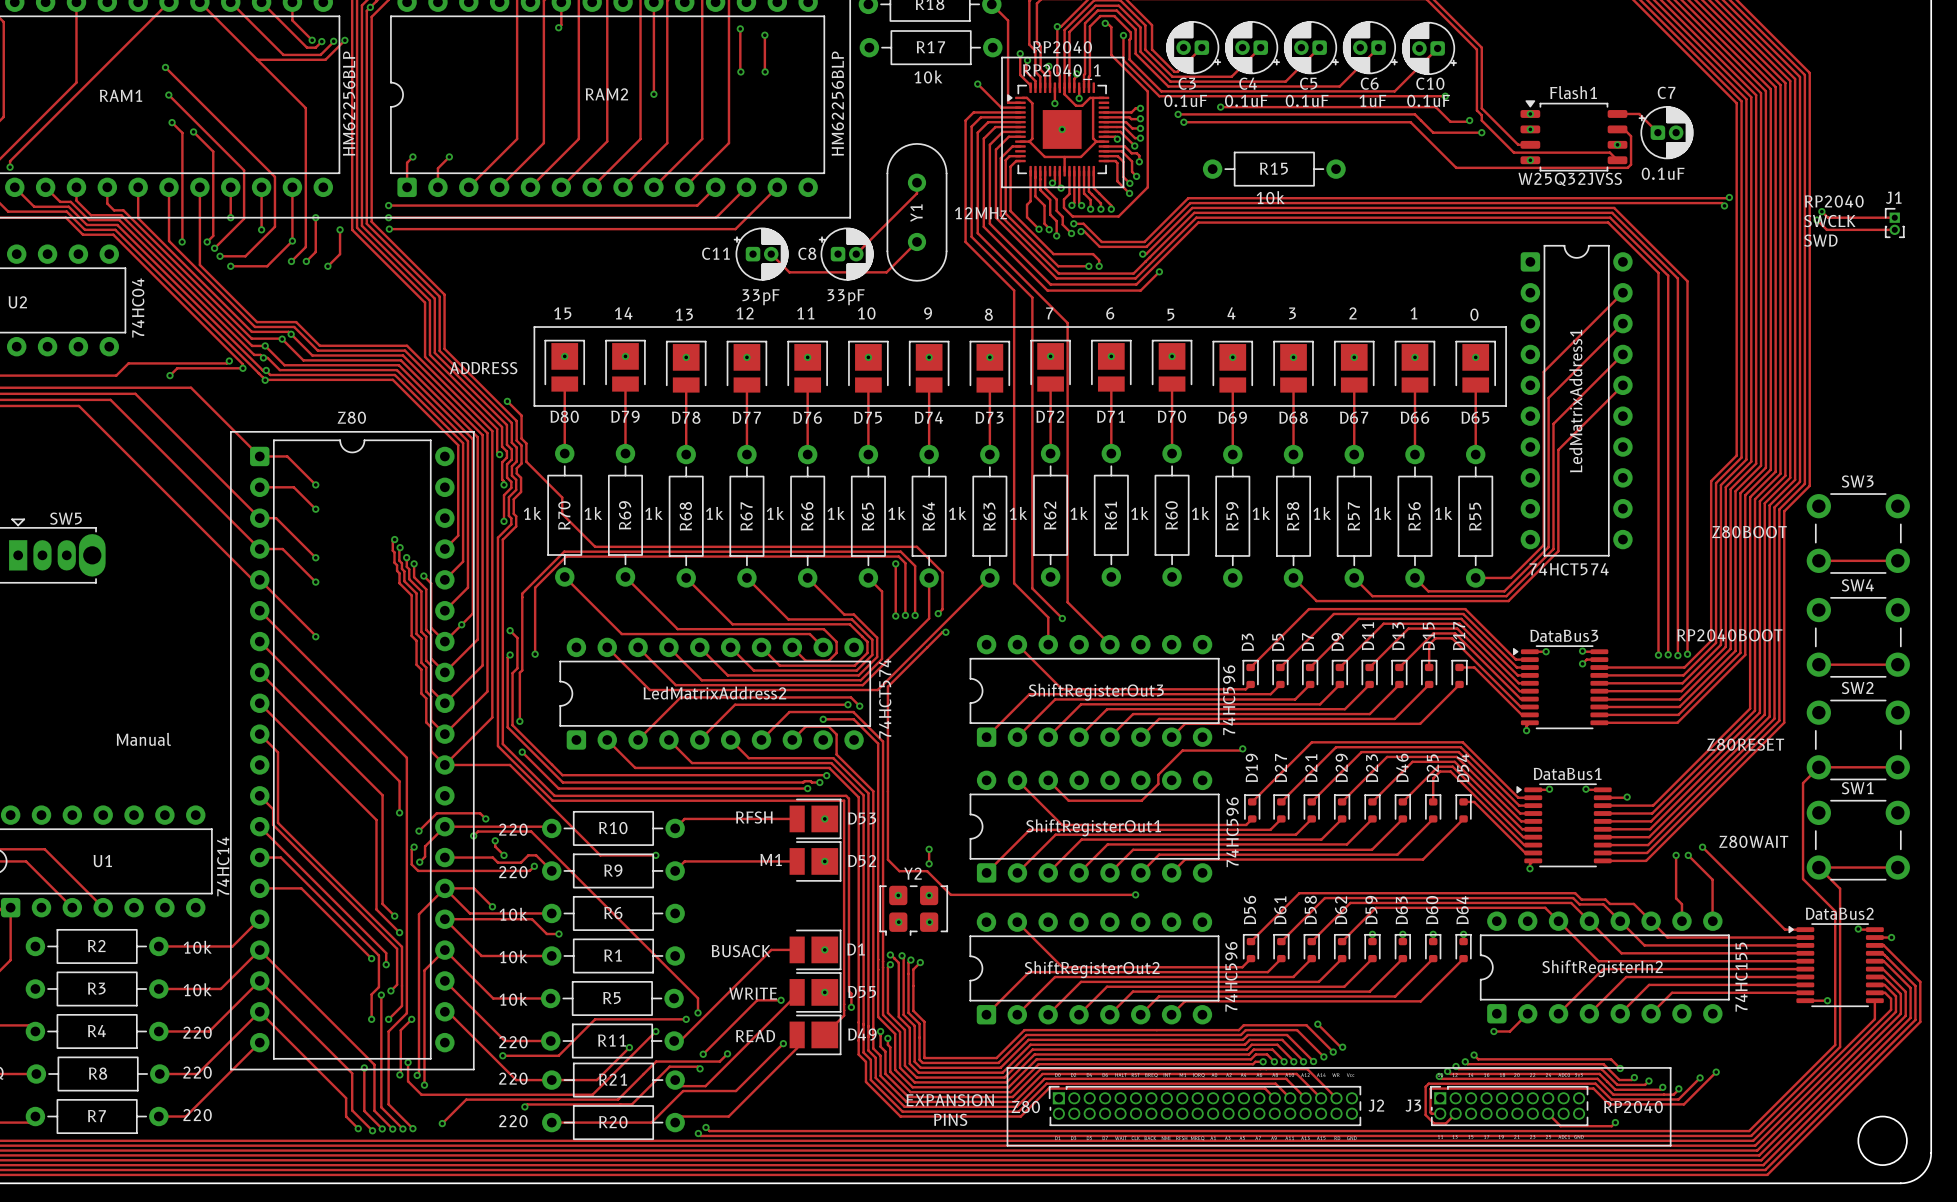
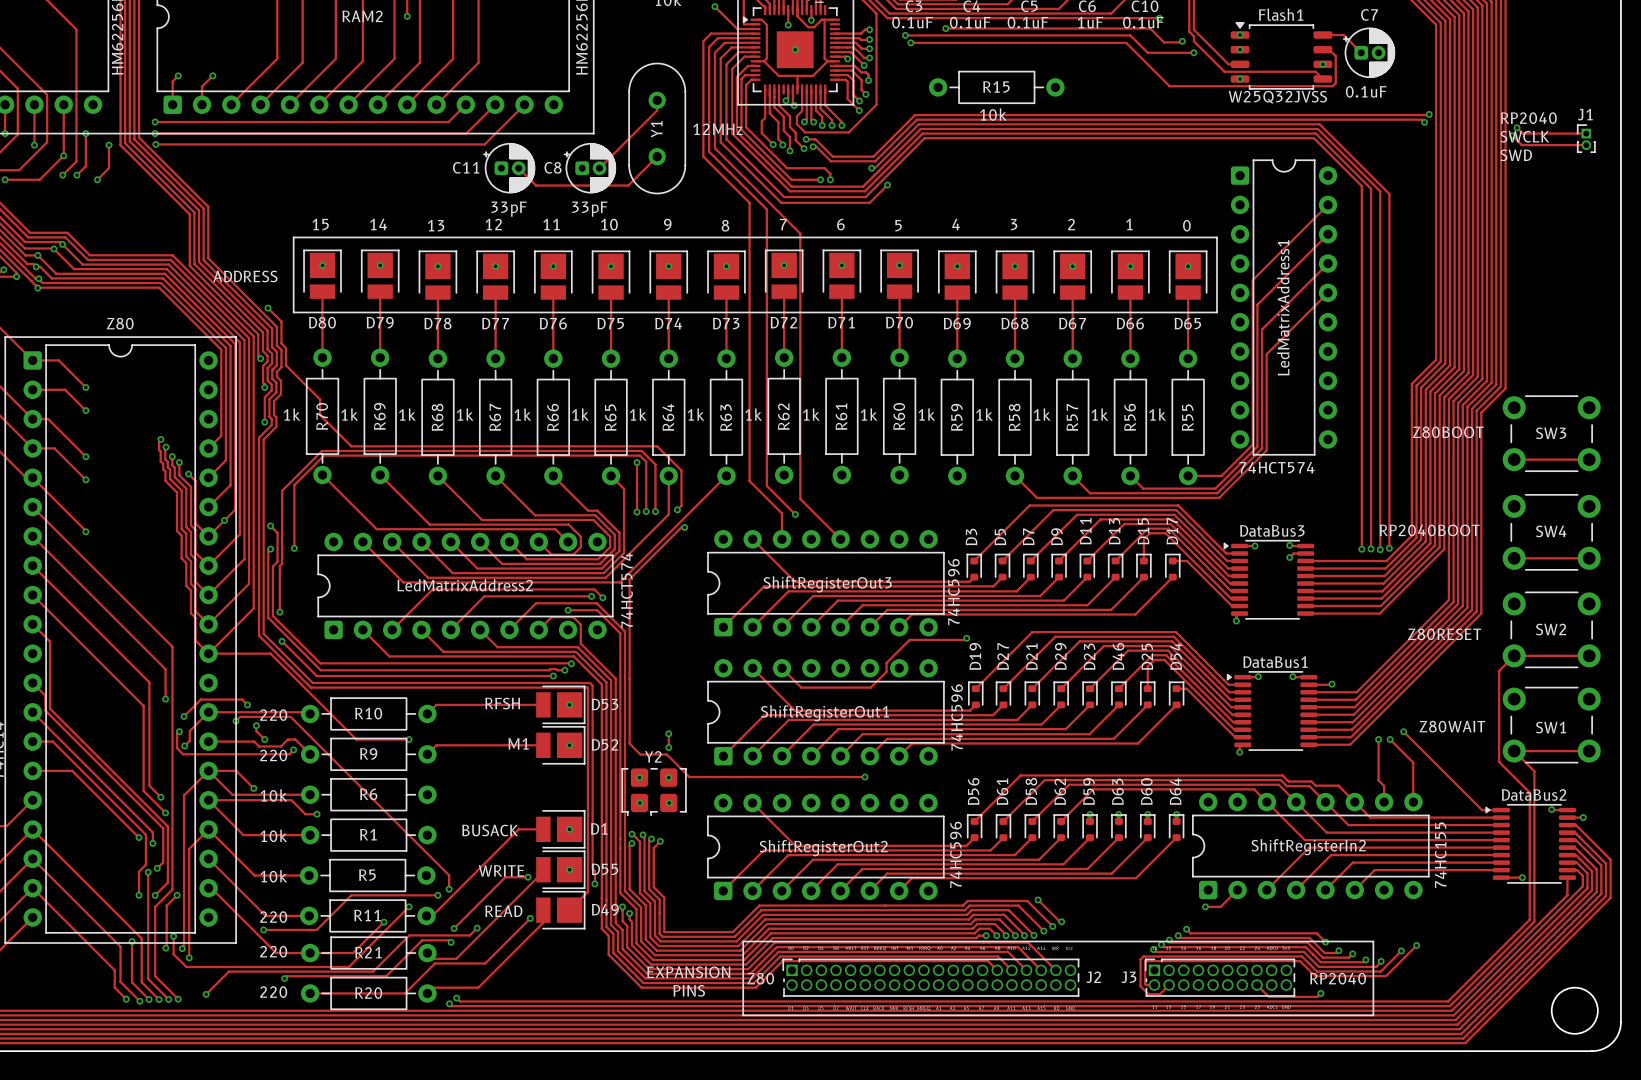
SW3 name position: SW3 (1857, 481) -> SW3 (1551, 433)
SW4 name position: SW4 (1857, 585) -> SW4 (1551, 531)
SW2 name position: SW2 (1857, 687) -> SW2 (1551, 629)
SW1 name position: SW1 (1857, 788) -> SW1 (1551, 727)

